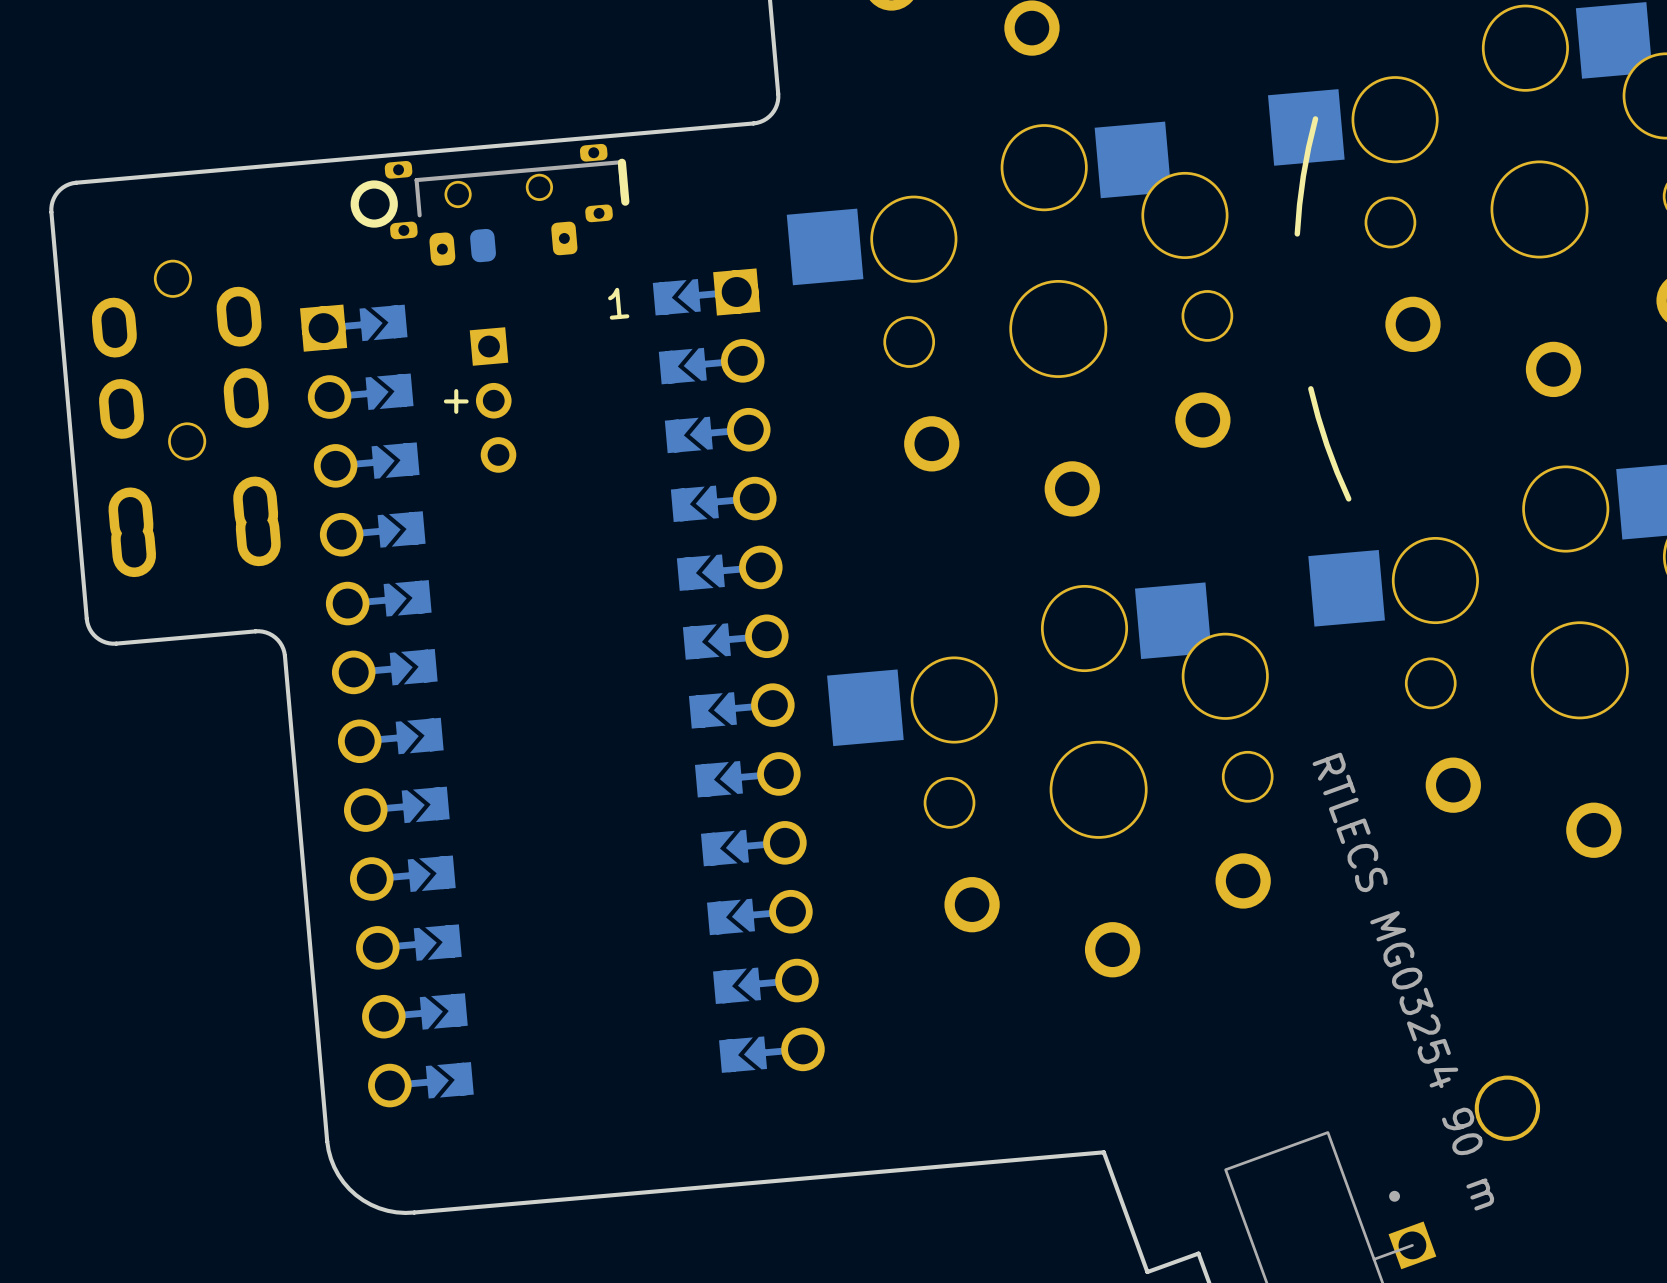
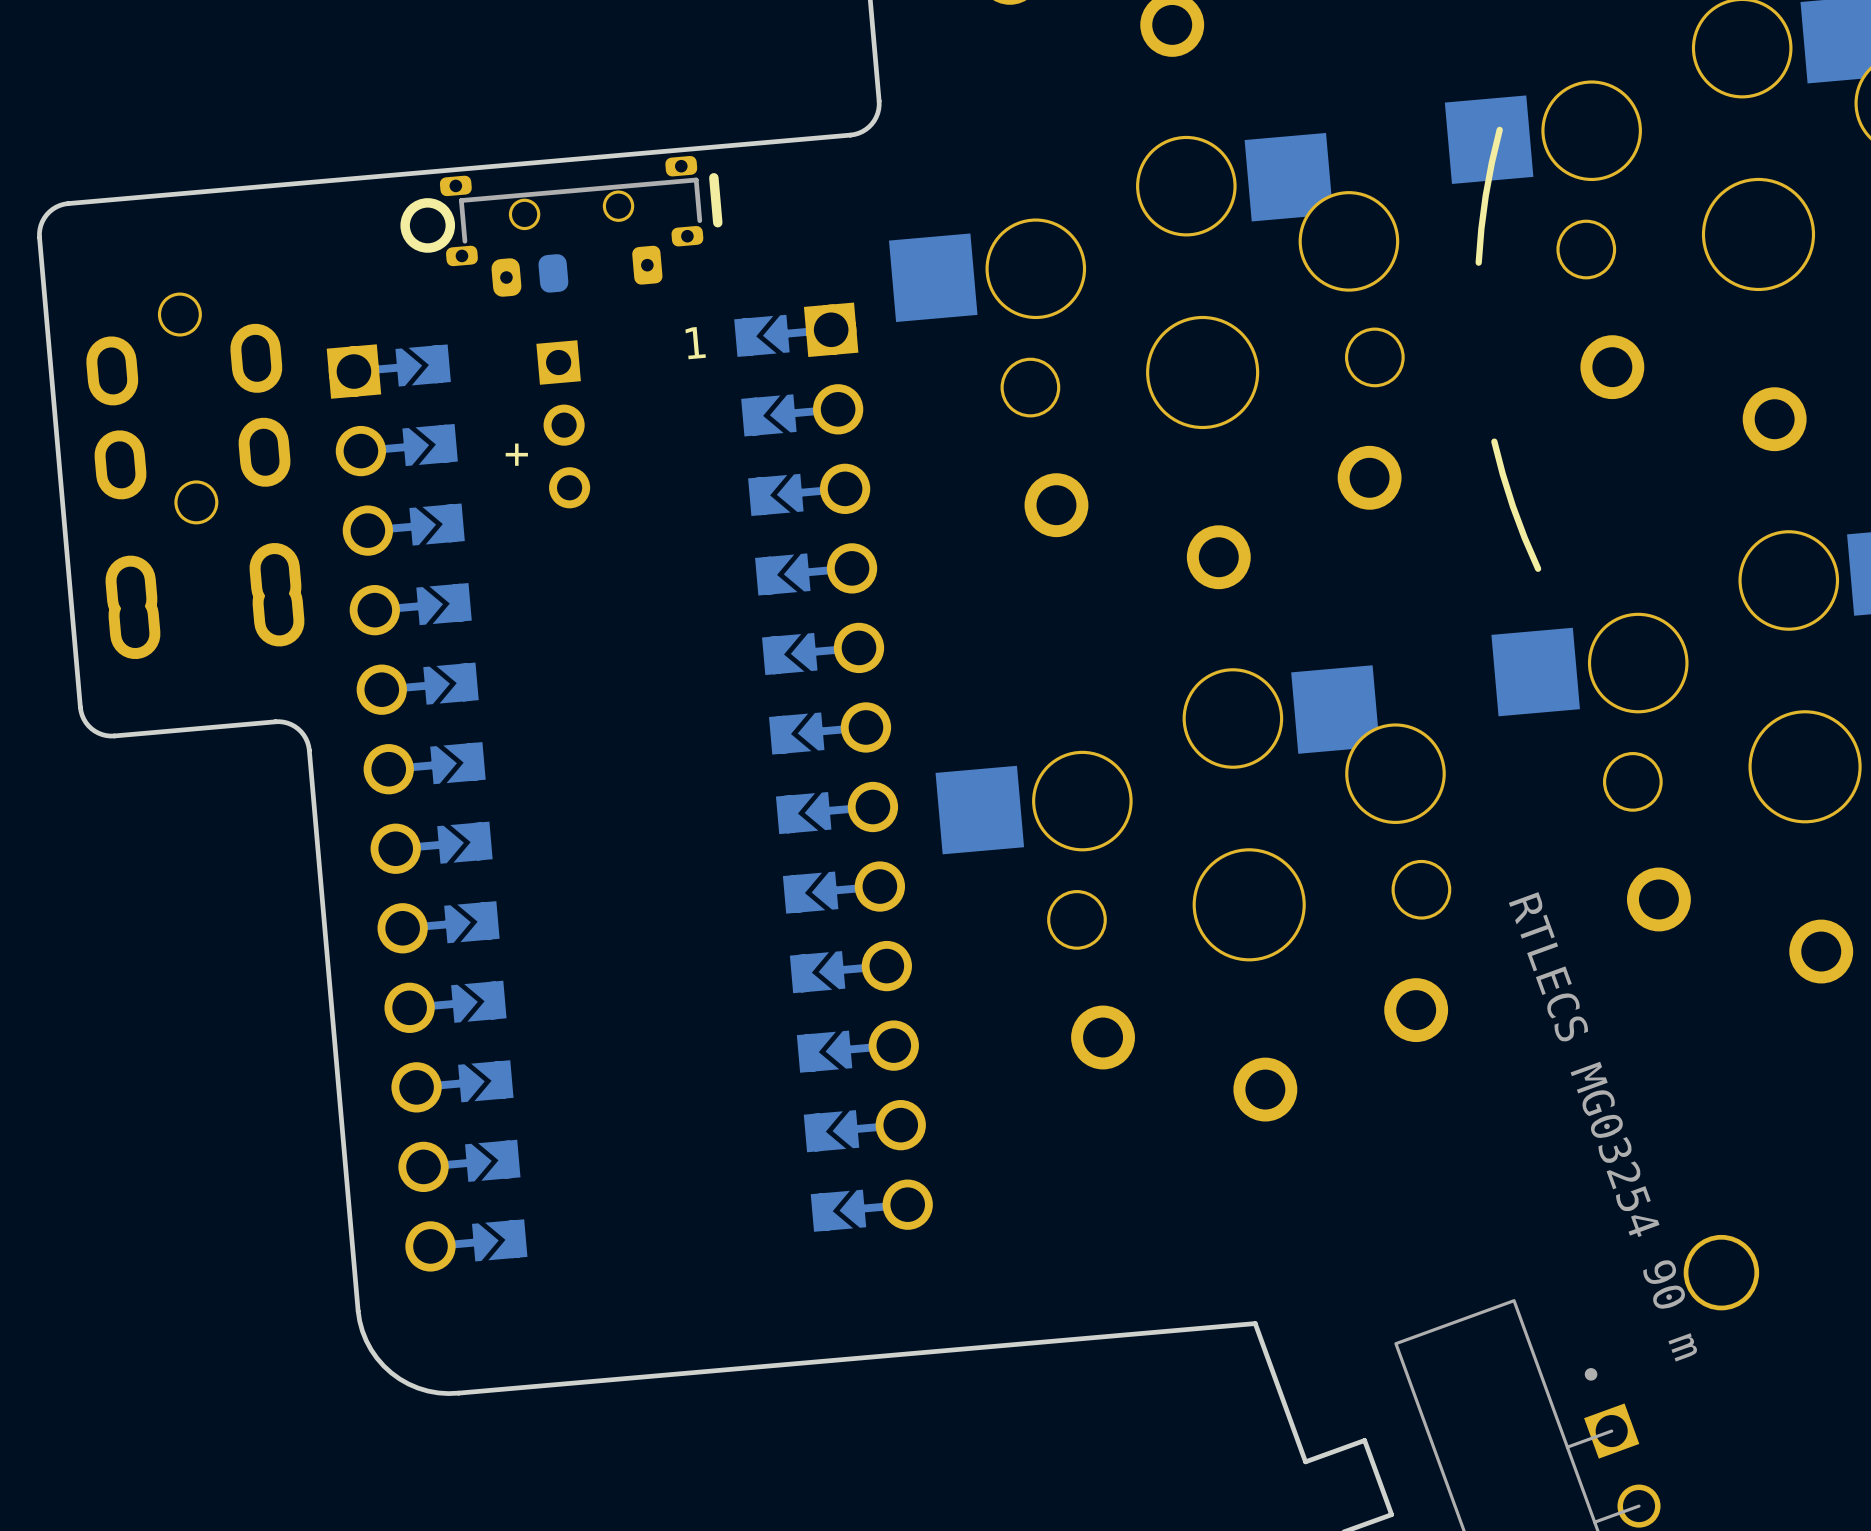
part position: (490, 204) -> (561, 226)
part position: (493, 399) -> (563, 424)

